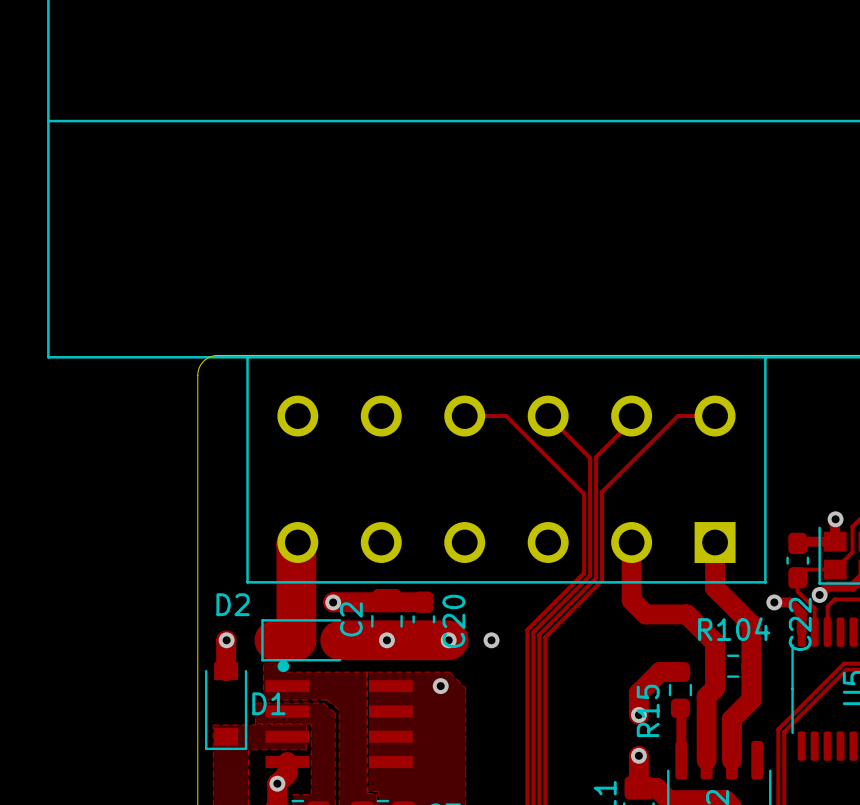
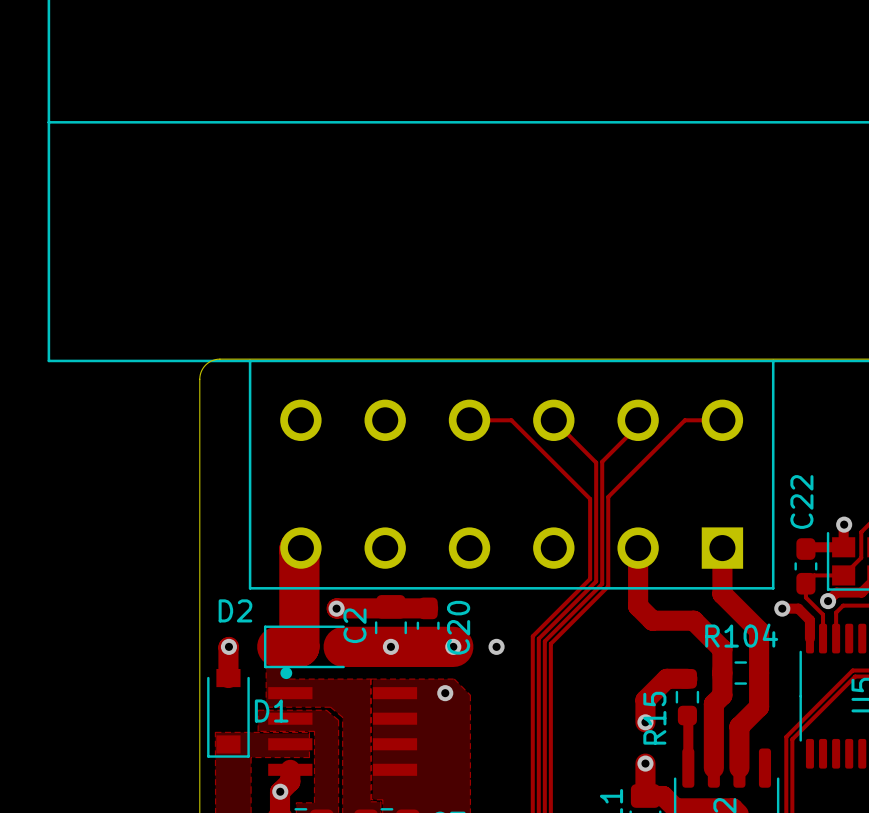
C22 name position: C22 (800, 624) -> C22 (801, 502)

